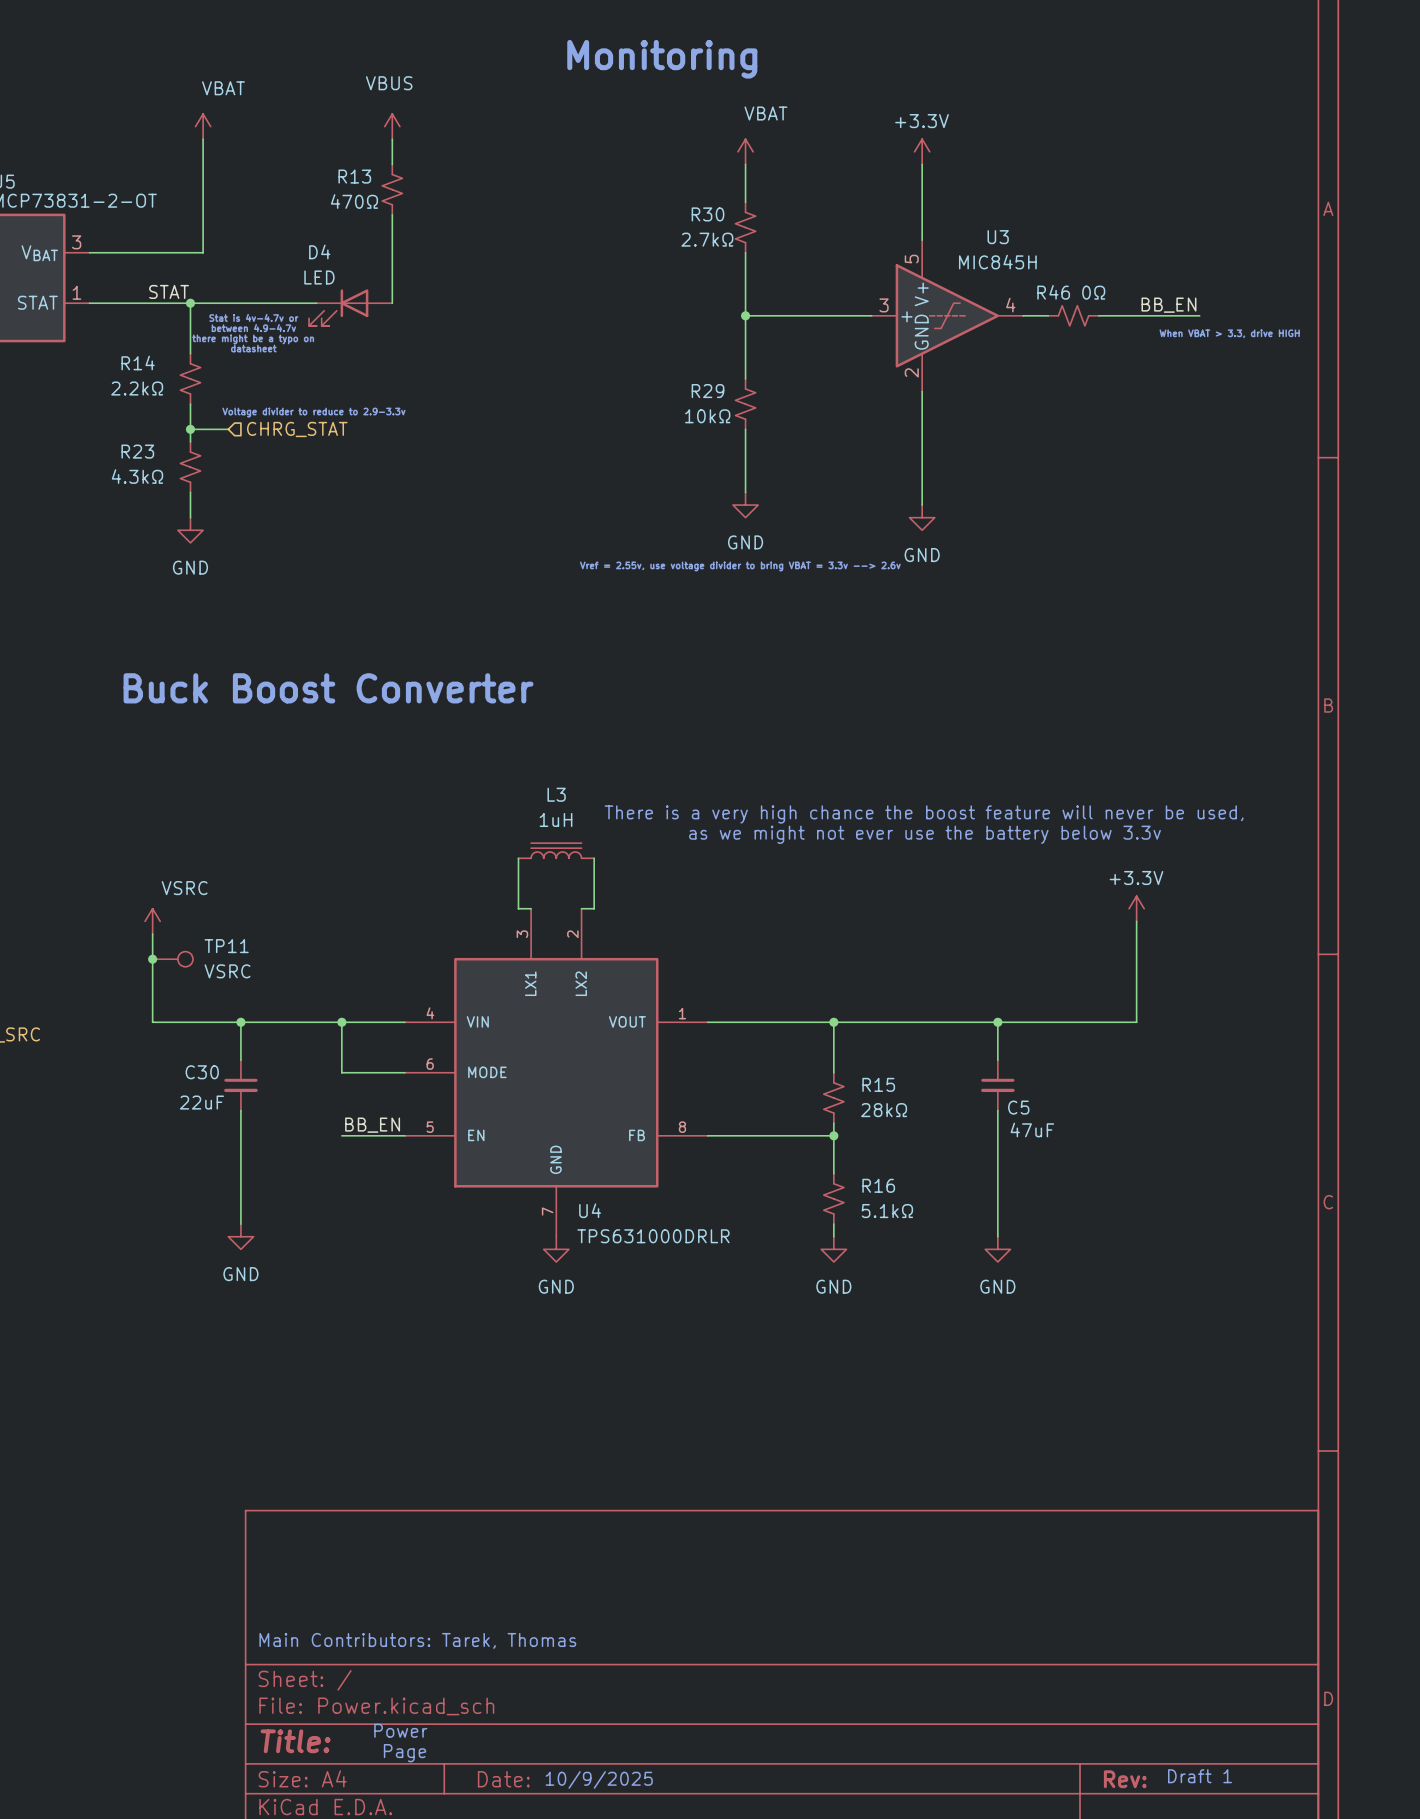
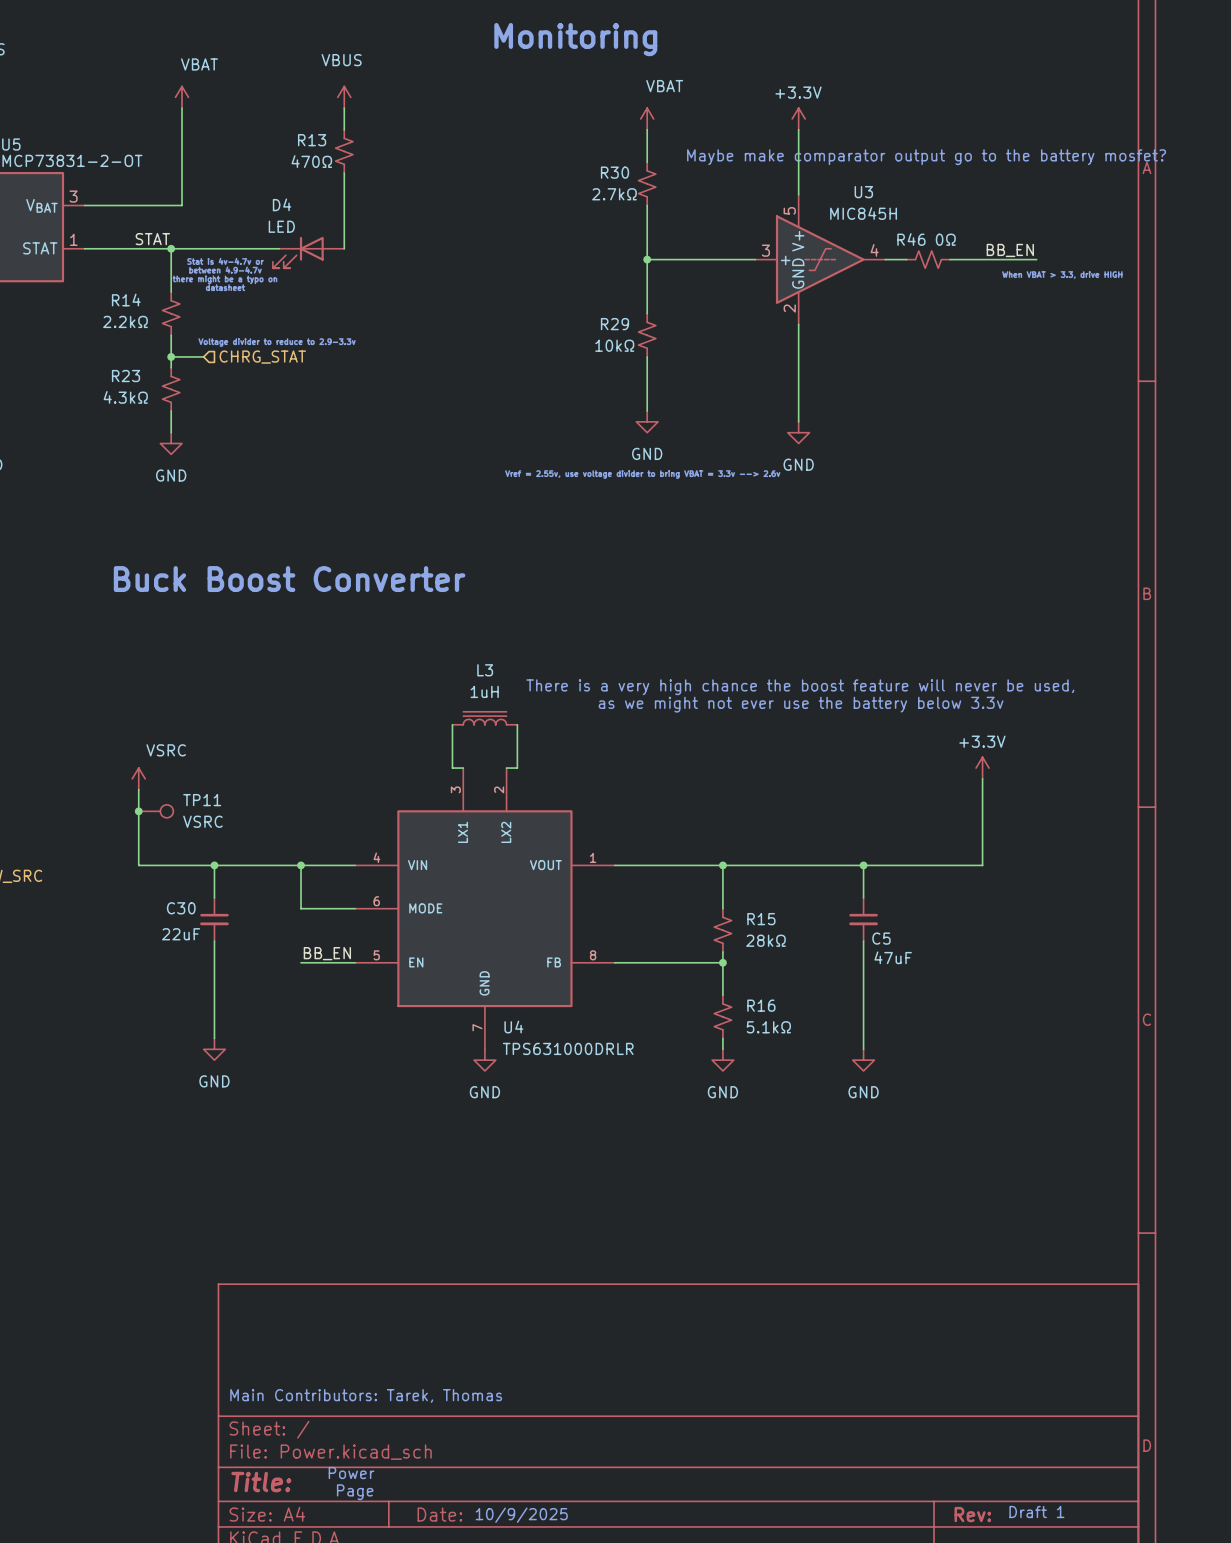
text: none -> Maybe make comparator output go to the battery mosfet? (926, 157)

